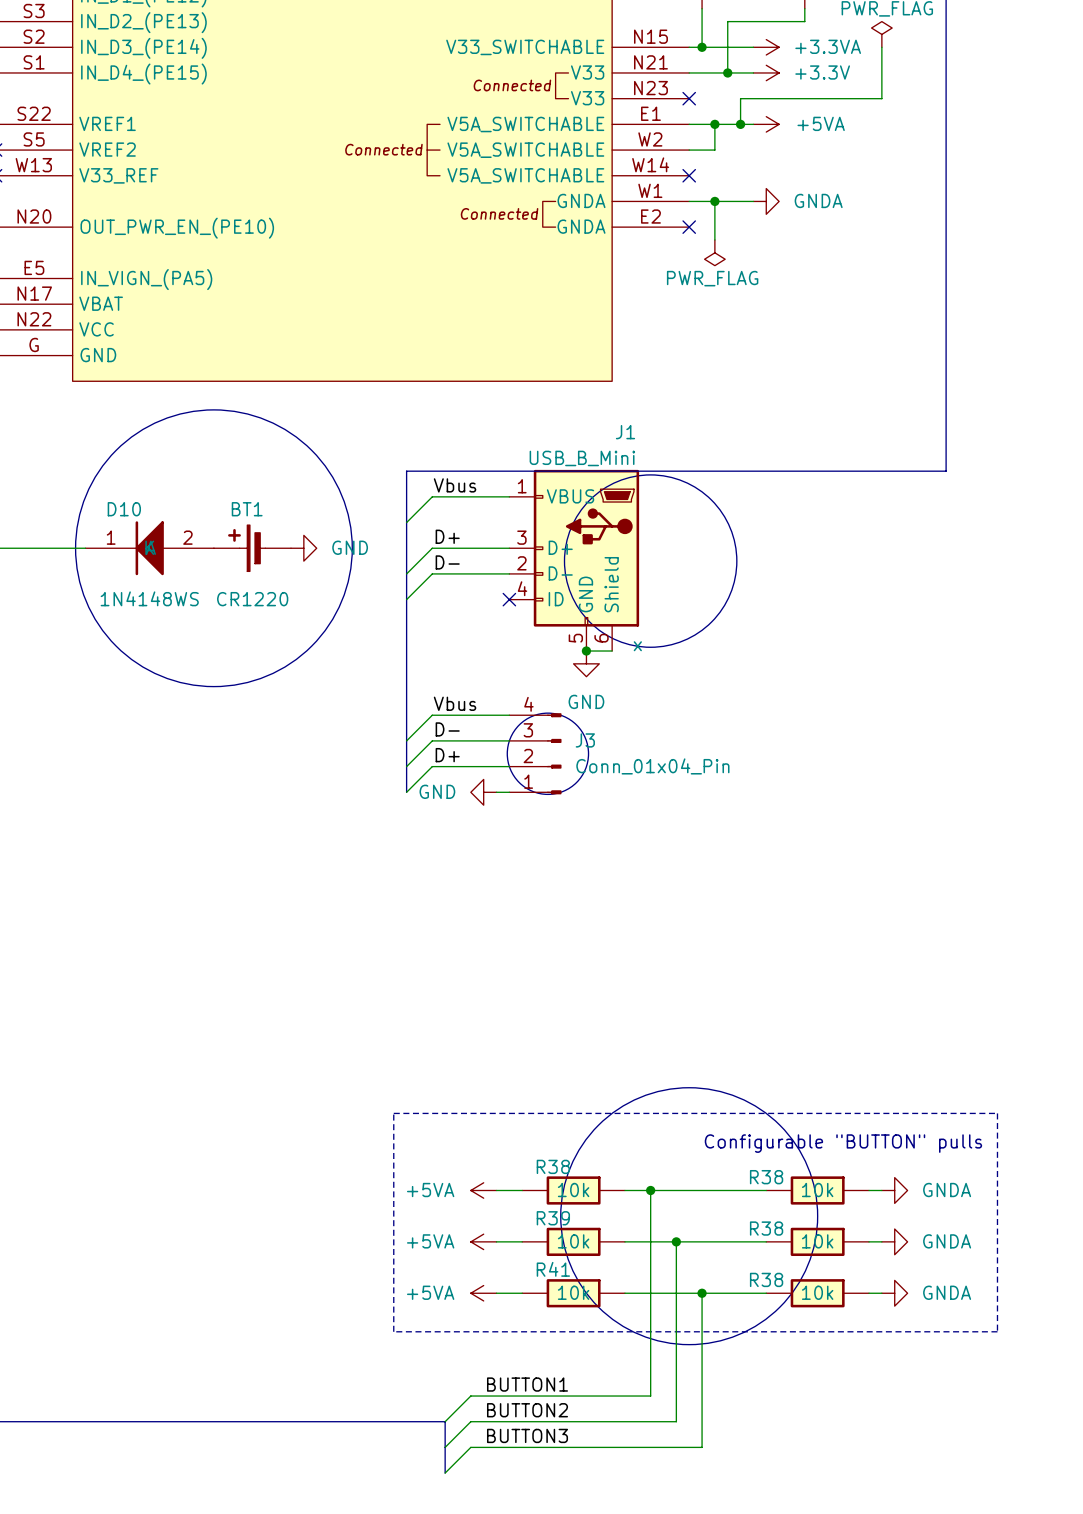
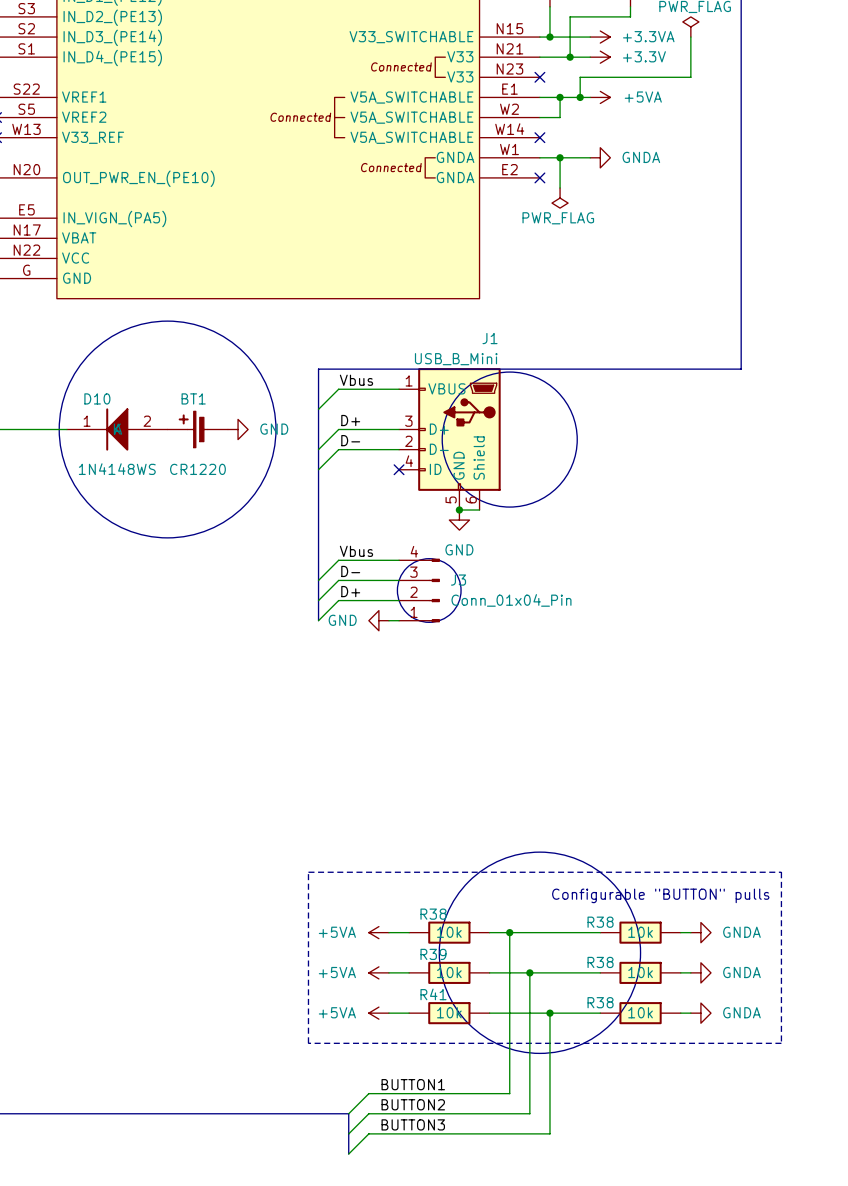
J1 text: x (637, 646) -> none

